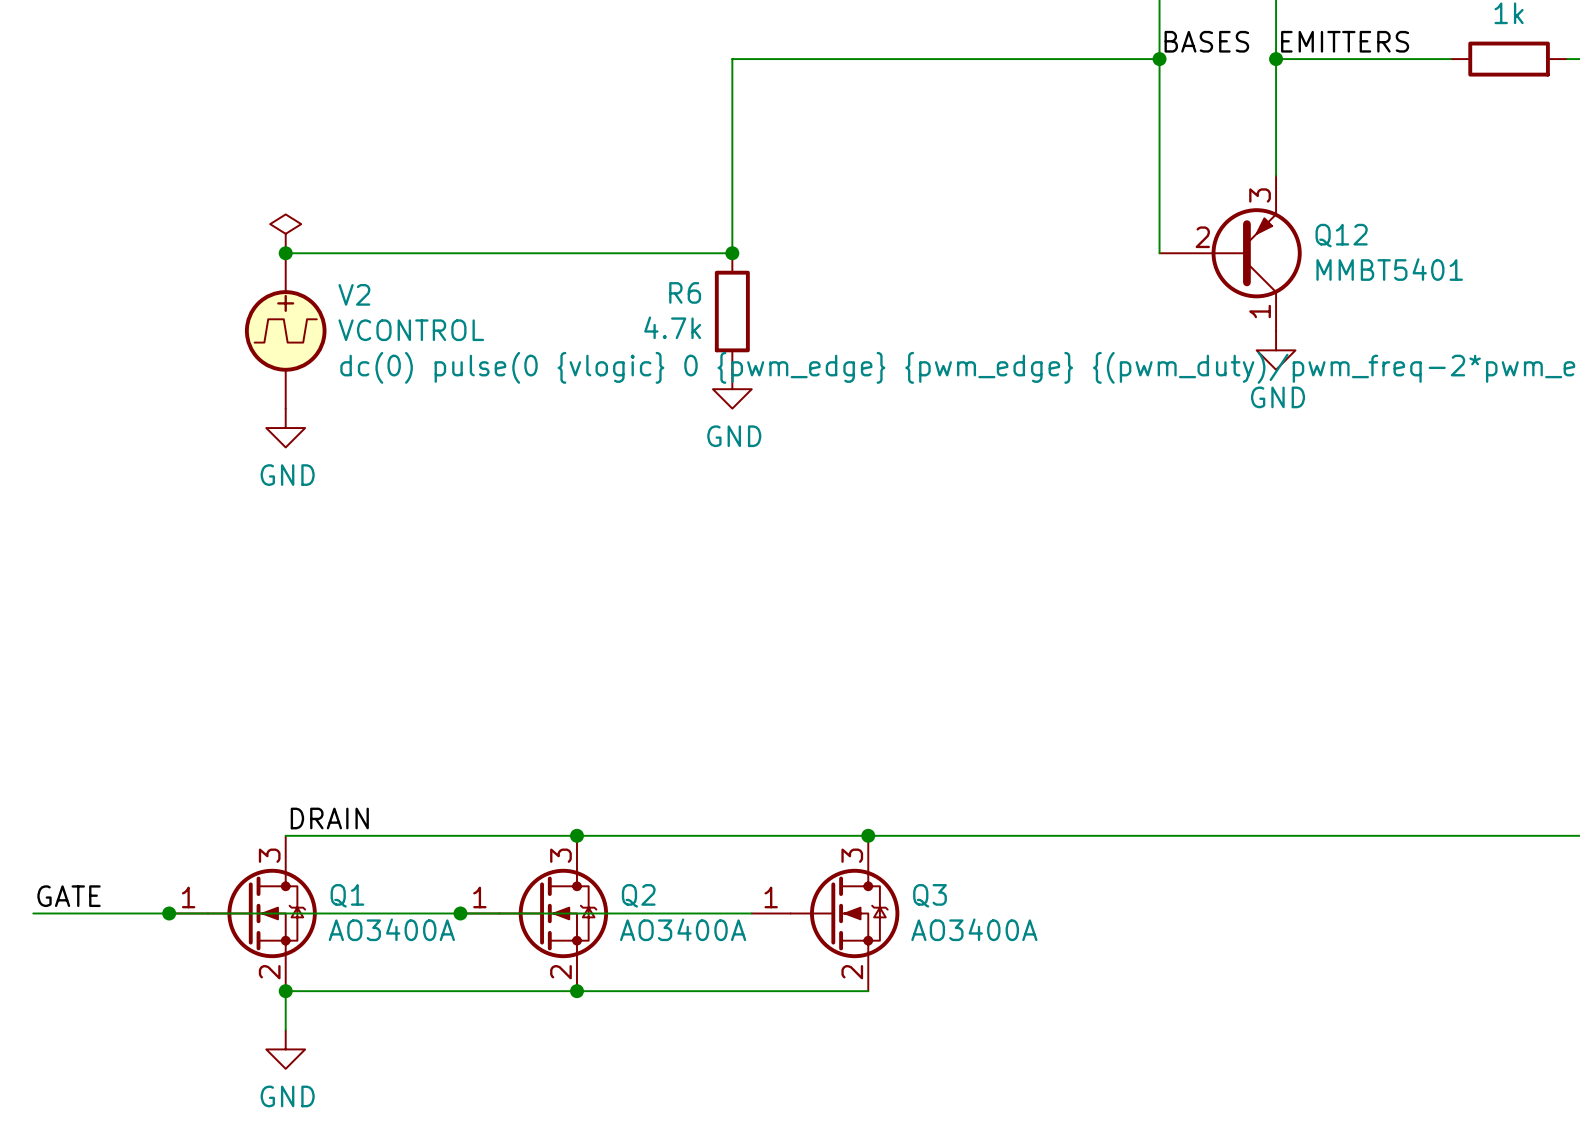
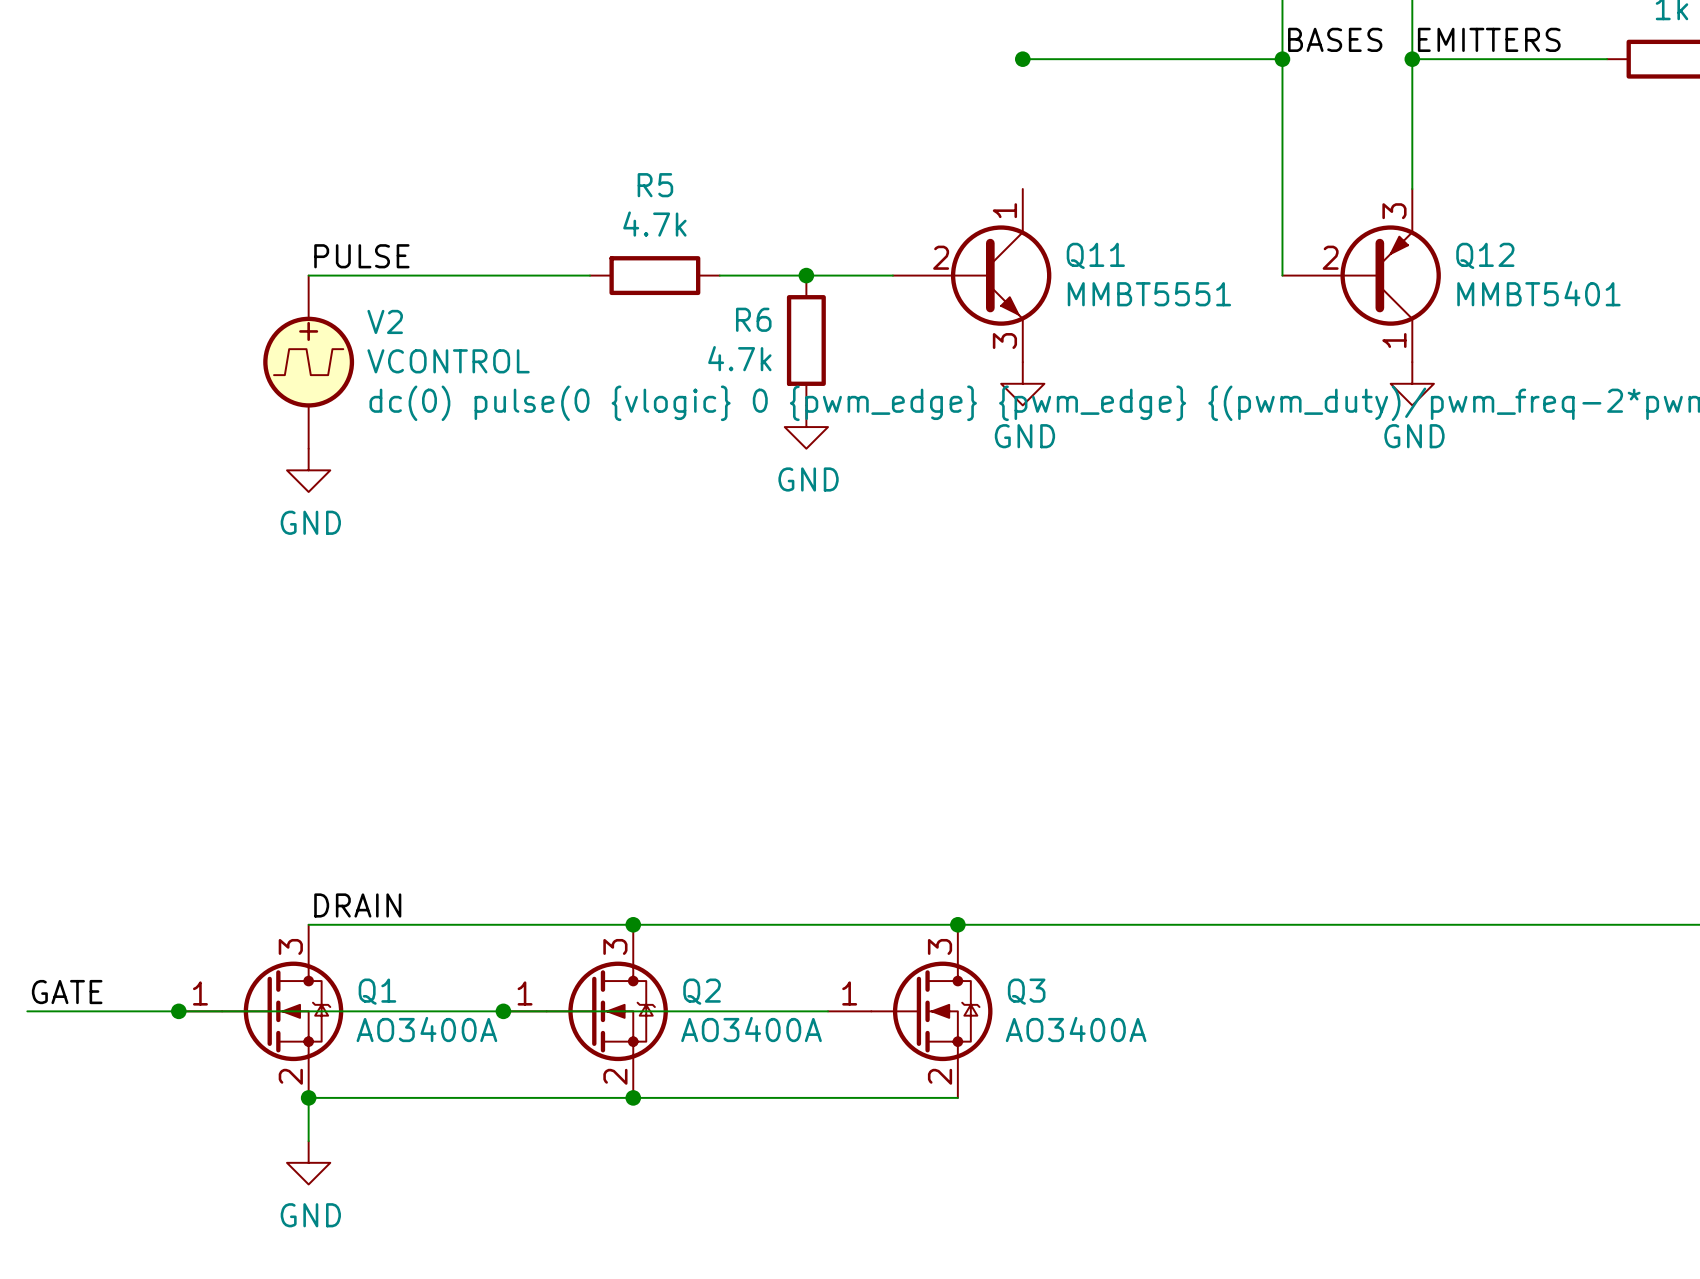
wire: (926, 59) (732, 59) (732, 253) -> (892, 275) (806, 275)
junction: none -> (1022, 59)
power symbol: (285, 233) -> none
label: none -> PULSE (361, 256)
junction: (285, 253) -> none
wire: (538, 253) (654, 253) -> none
R5: none -> 4.7k (654, 275)
Q11: none -> MMBT5551 (972, 275)
power symbol: none -> GND (1022, 383)

